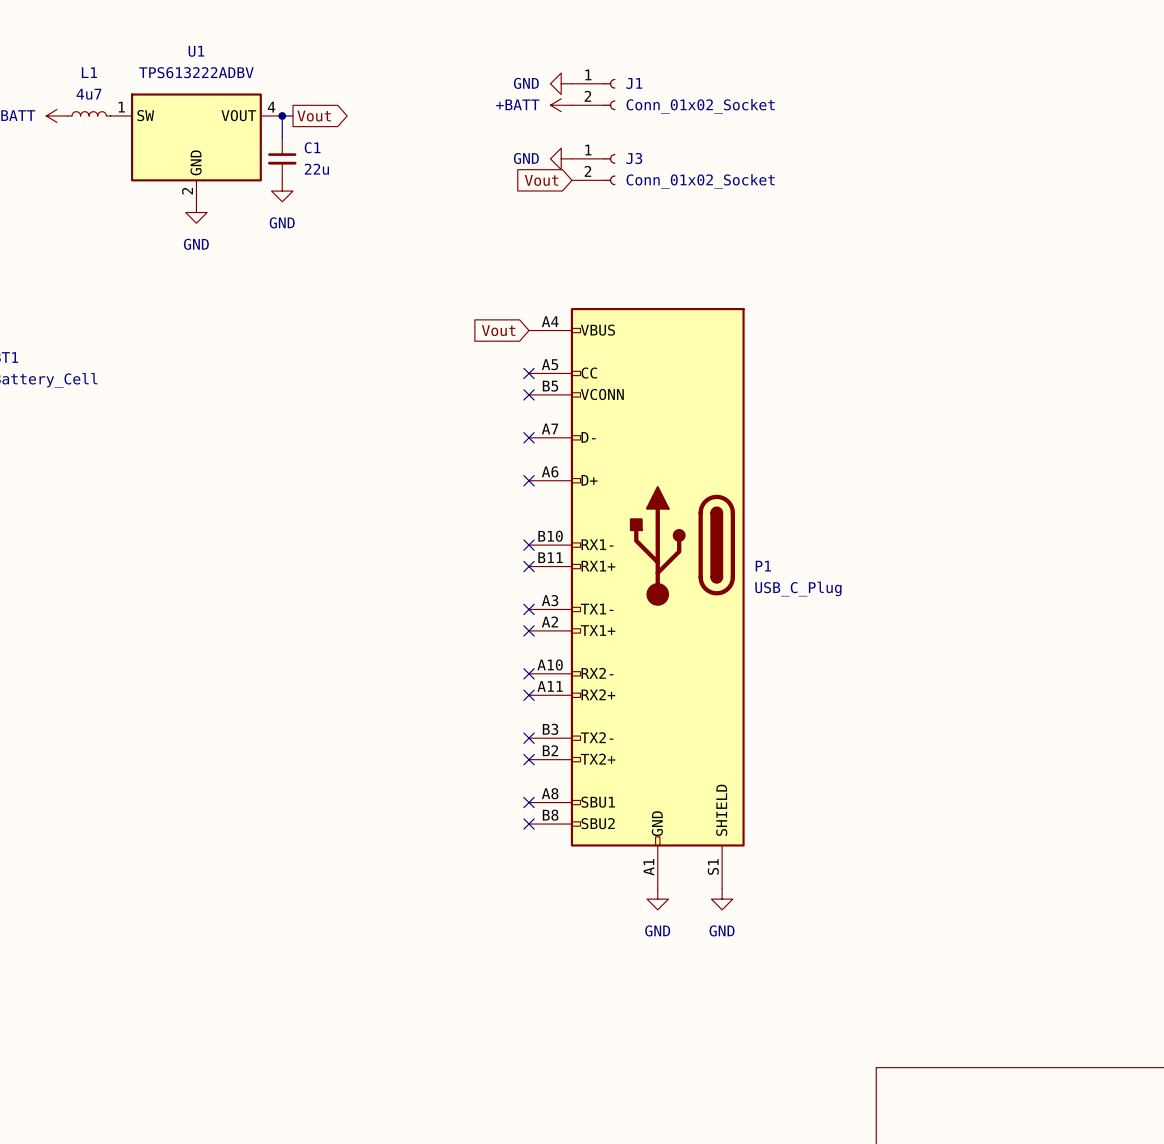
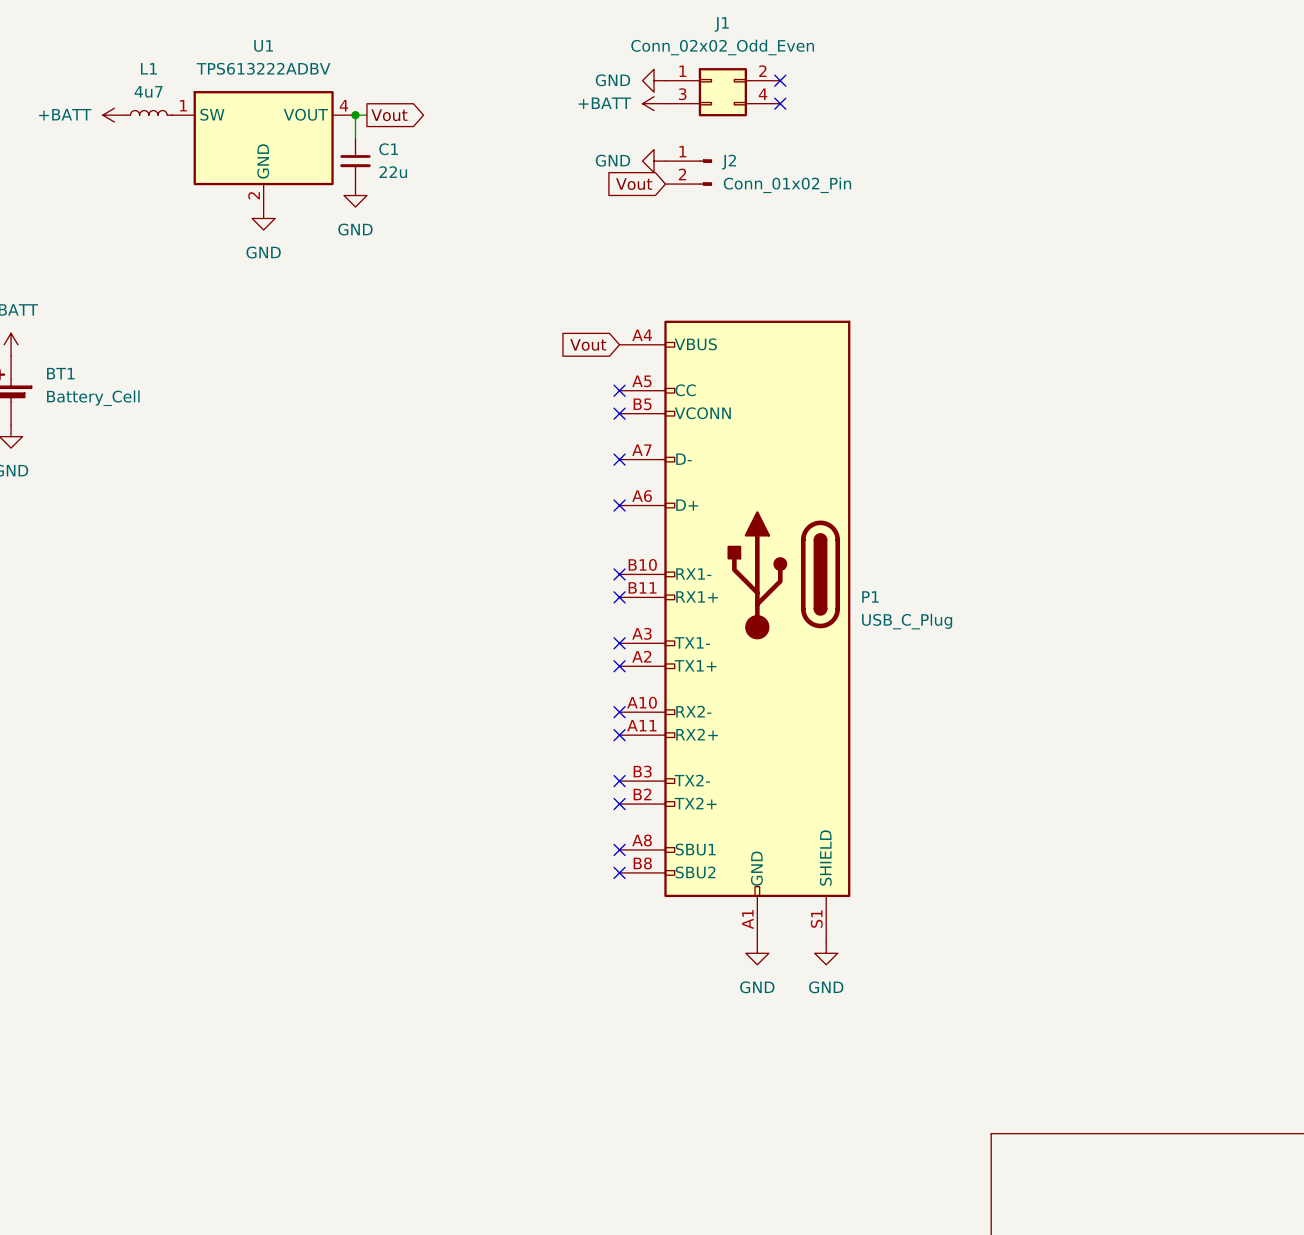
J1 symbol: [571, 78, 616, 111] -> [665, 68, 781, 117]
J1 name position: J1 (634, 83) -> J1 (721, 24)
no-connect mark: none -> (780, 80)
no-connect mark: none -> (780, 103)
J1 value: Conn_01x02_Socket (700, 106) -> Conn_02x02_Odd_Even (722, 47)
J3: Conn_01x02_Socket (593, 169) -> none
J2: none -> Conn_01x02_Pin (688, 172)

